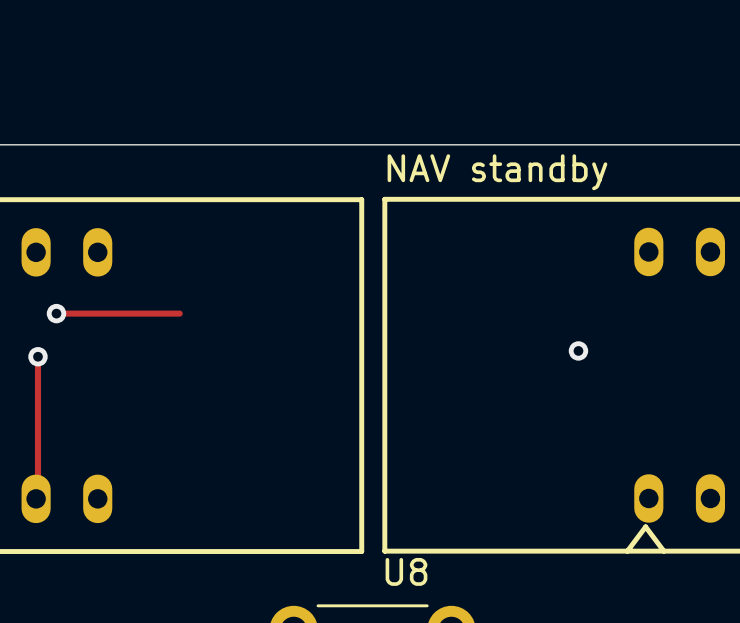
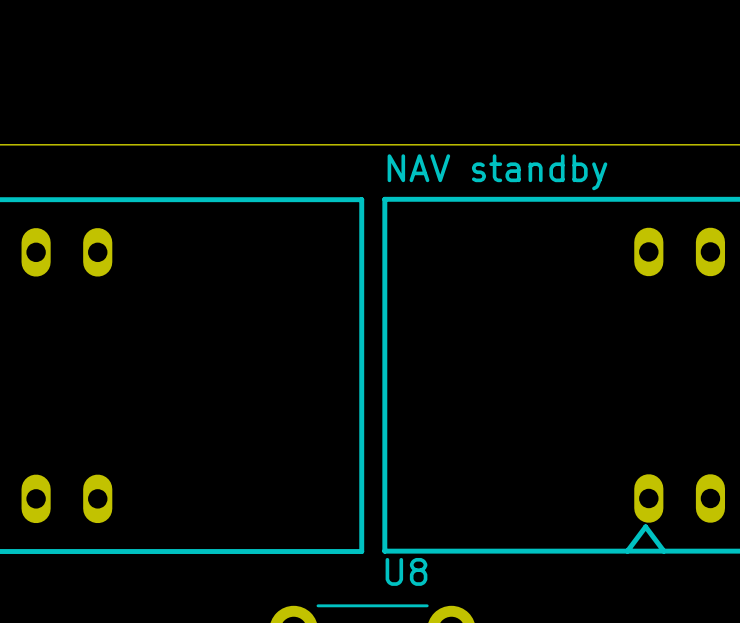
track: (56, 313) (179, 313) -> none
via: (56, 313) -> none
via: (578, 350) -> none
track: (37, 356) (37, 498) -> none
via: (37, 356) -> none

